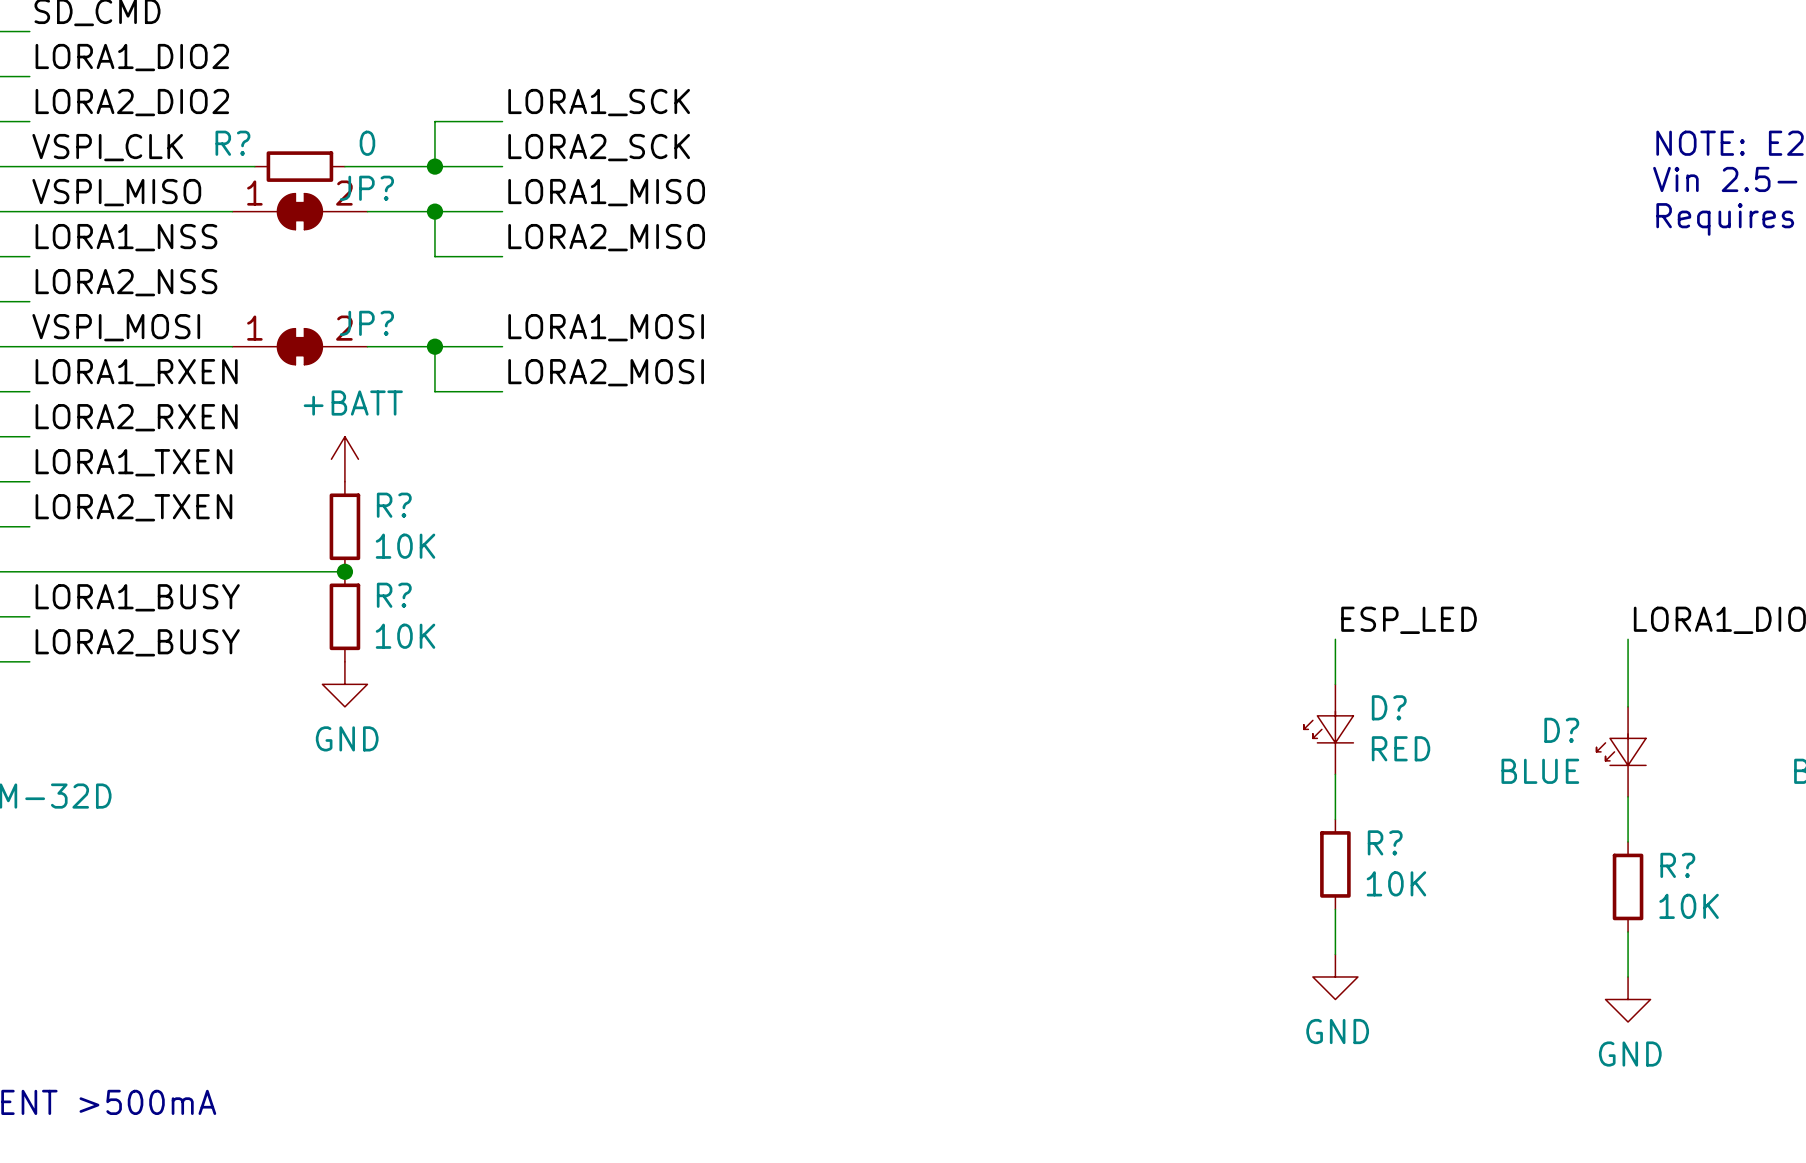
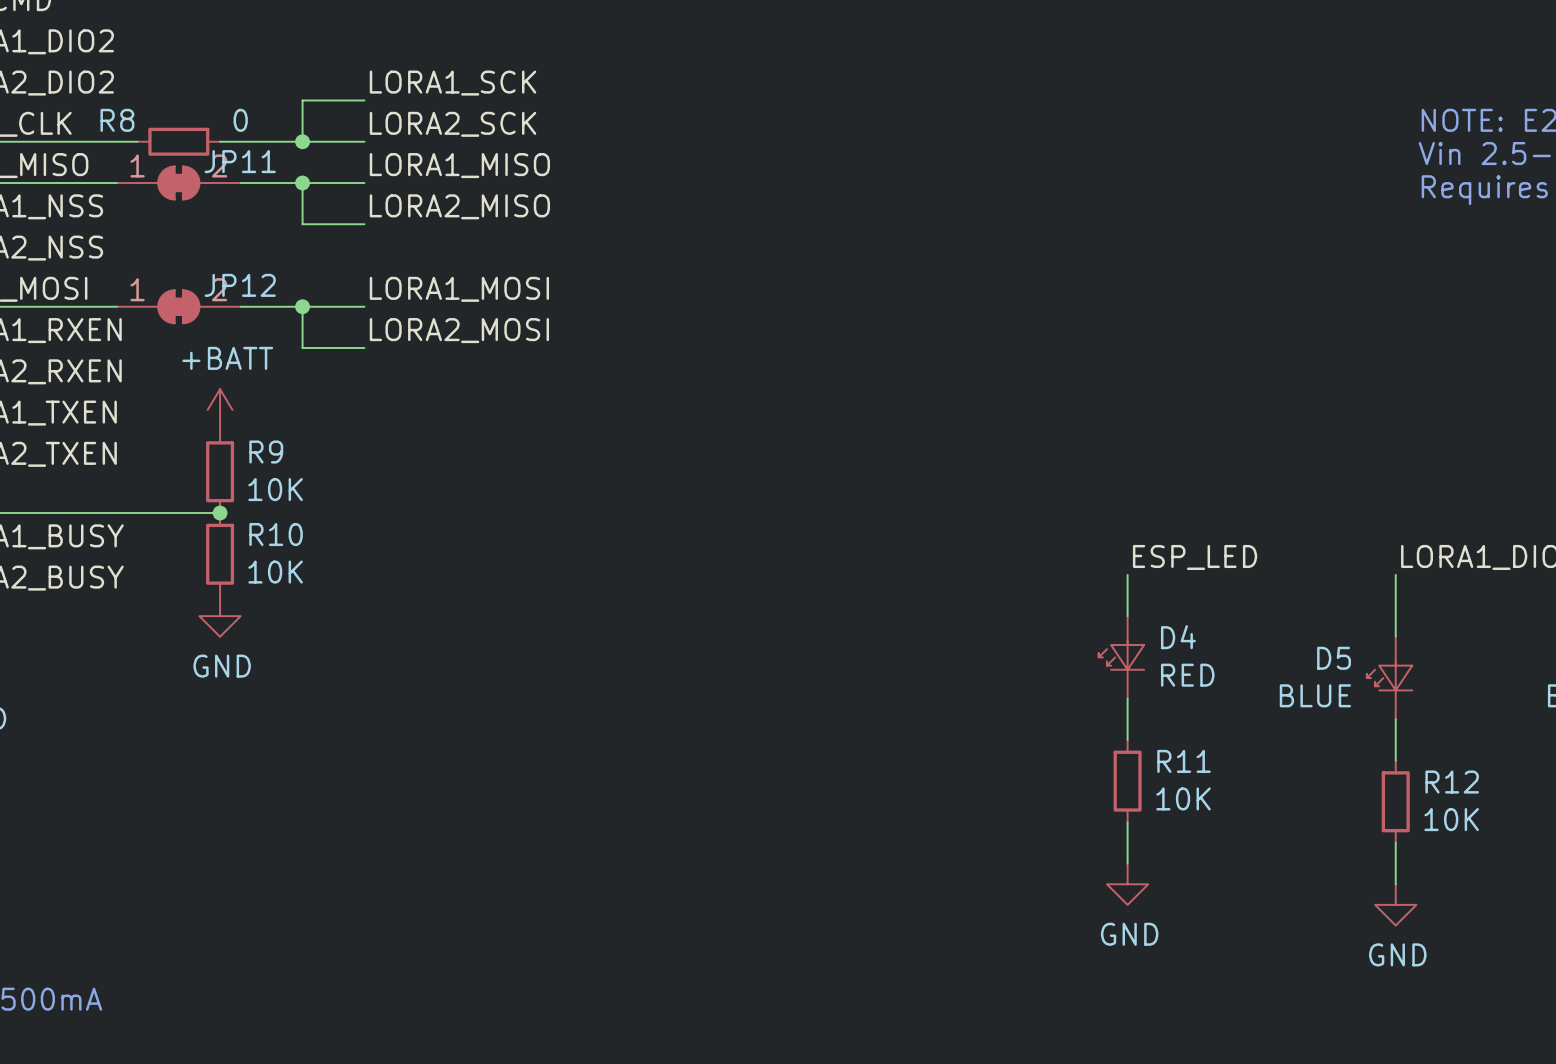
R? name: R? (232, 143) -> R8 (117, 120)
JP? name: JP? (366, 188) -> JP11 (240, 161)
JP? name: JP? (366, 323) -> JP12 (240, 285)
R? name: R? (394, 505) -> R9 (266, 452)
R? name: R? (394, 595) -> R10 (276, 534)
D? name: D? (1389, 707) -> D4 (1178, 637)
D? name: D? (1561, 730) -> D5 (1334, 658)
R? name: R? (1385, 842) -> R11 (1184, 761)
R? name: R? (1677, 865) -> R12 (1452, 782)

